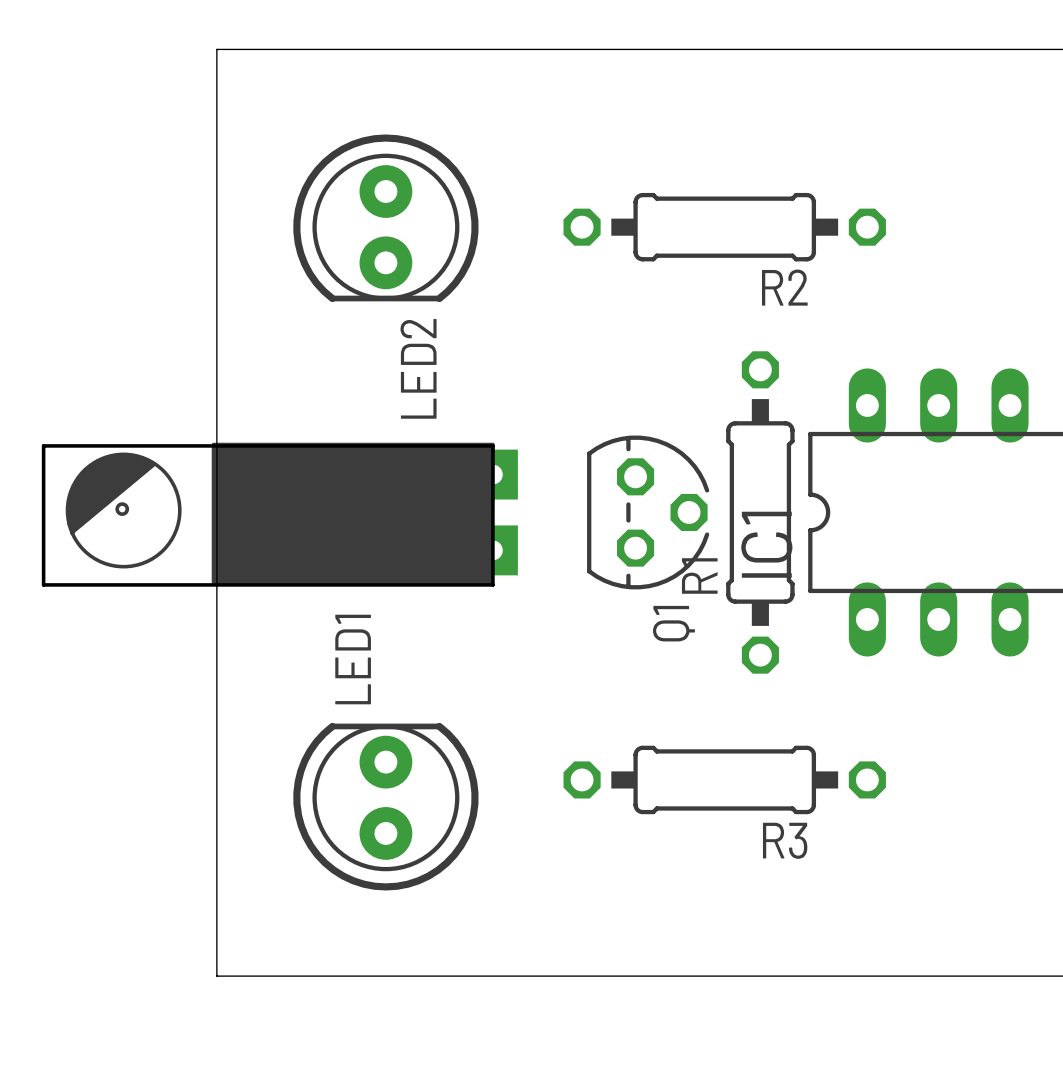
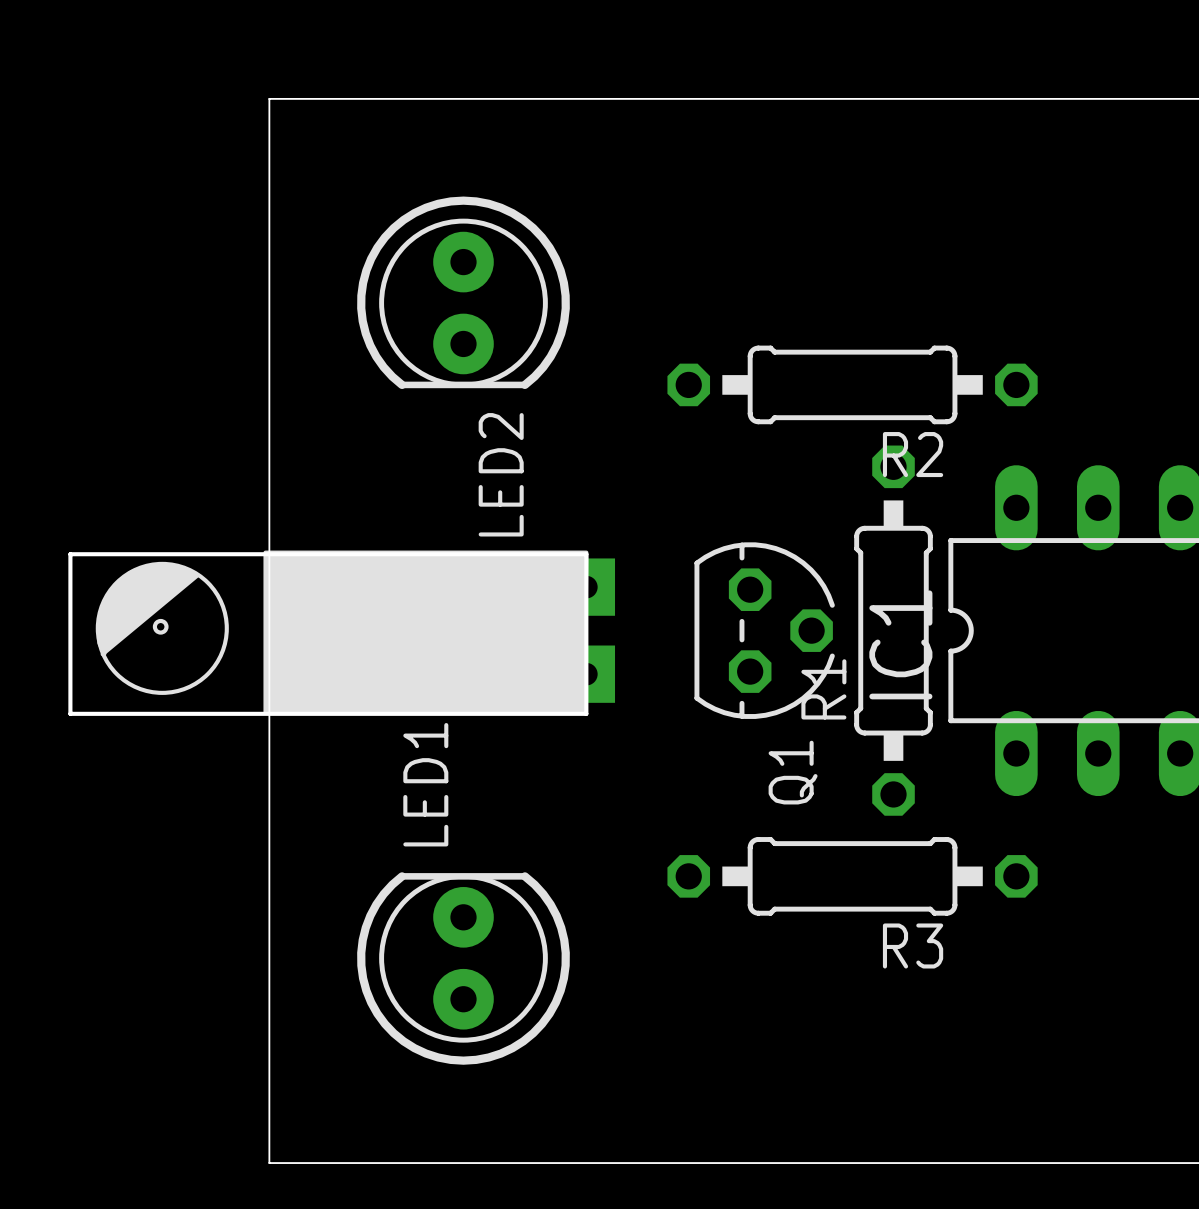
R2 position: (724, 227) -> (852, 384)
R3 position: (724, 779) -> (852, 876)

